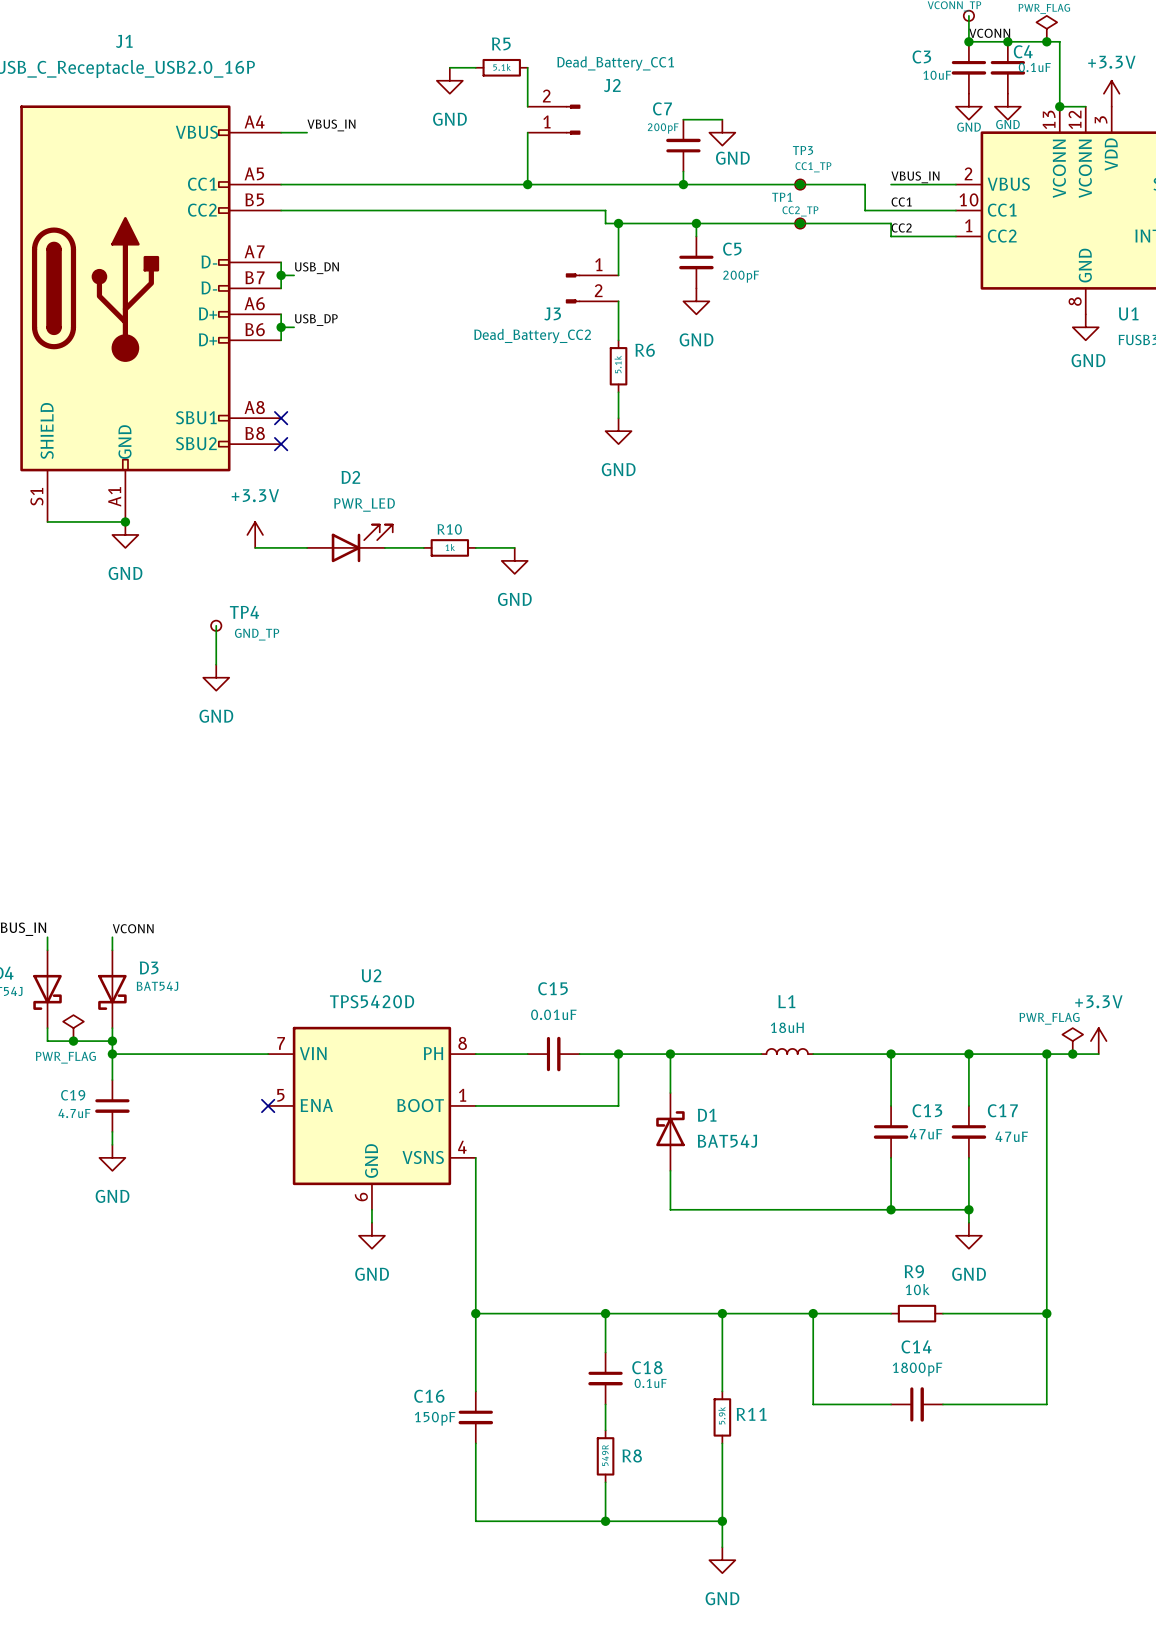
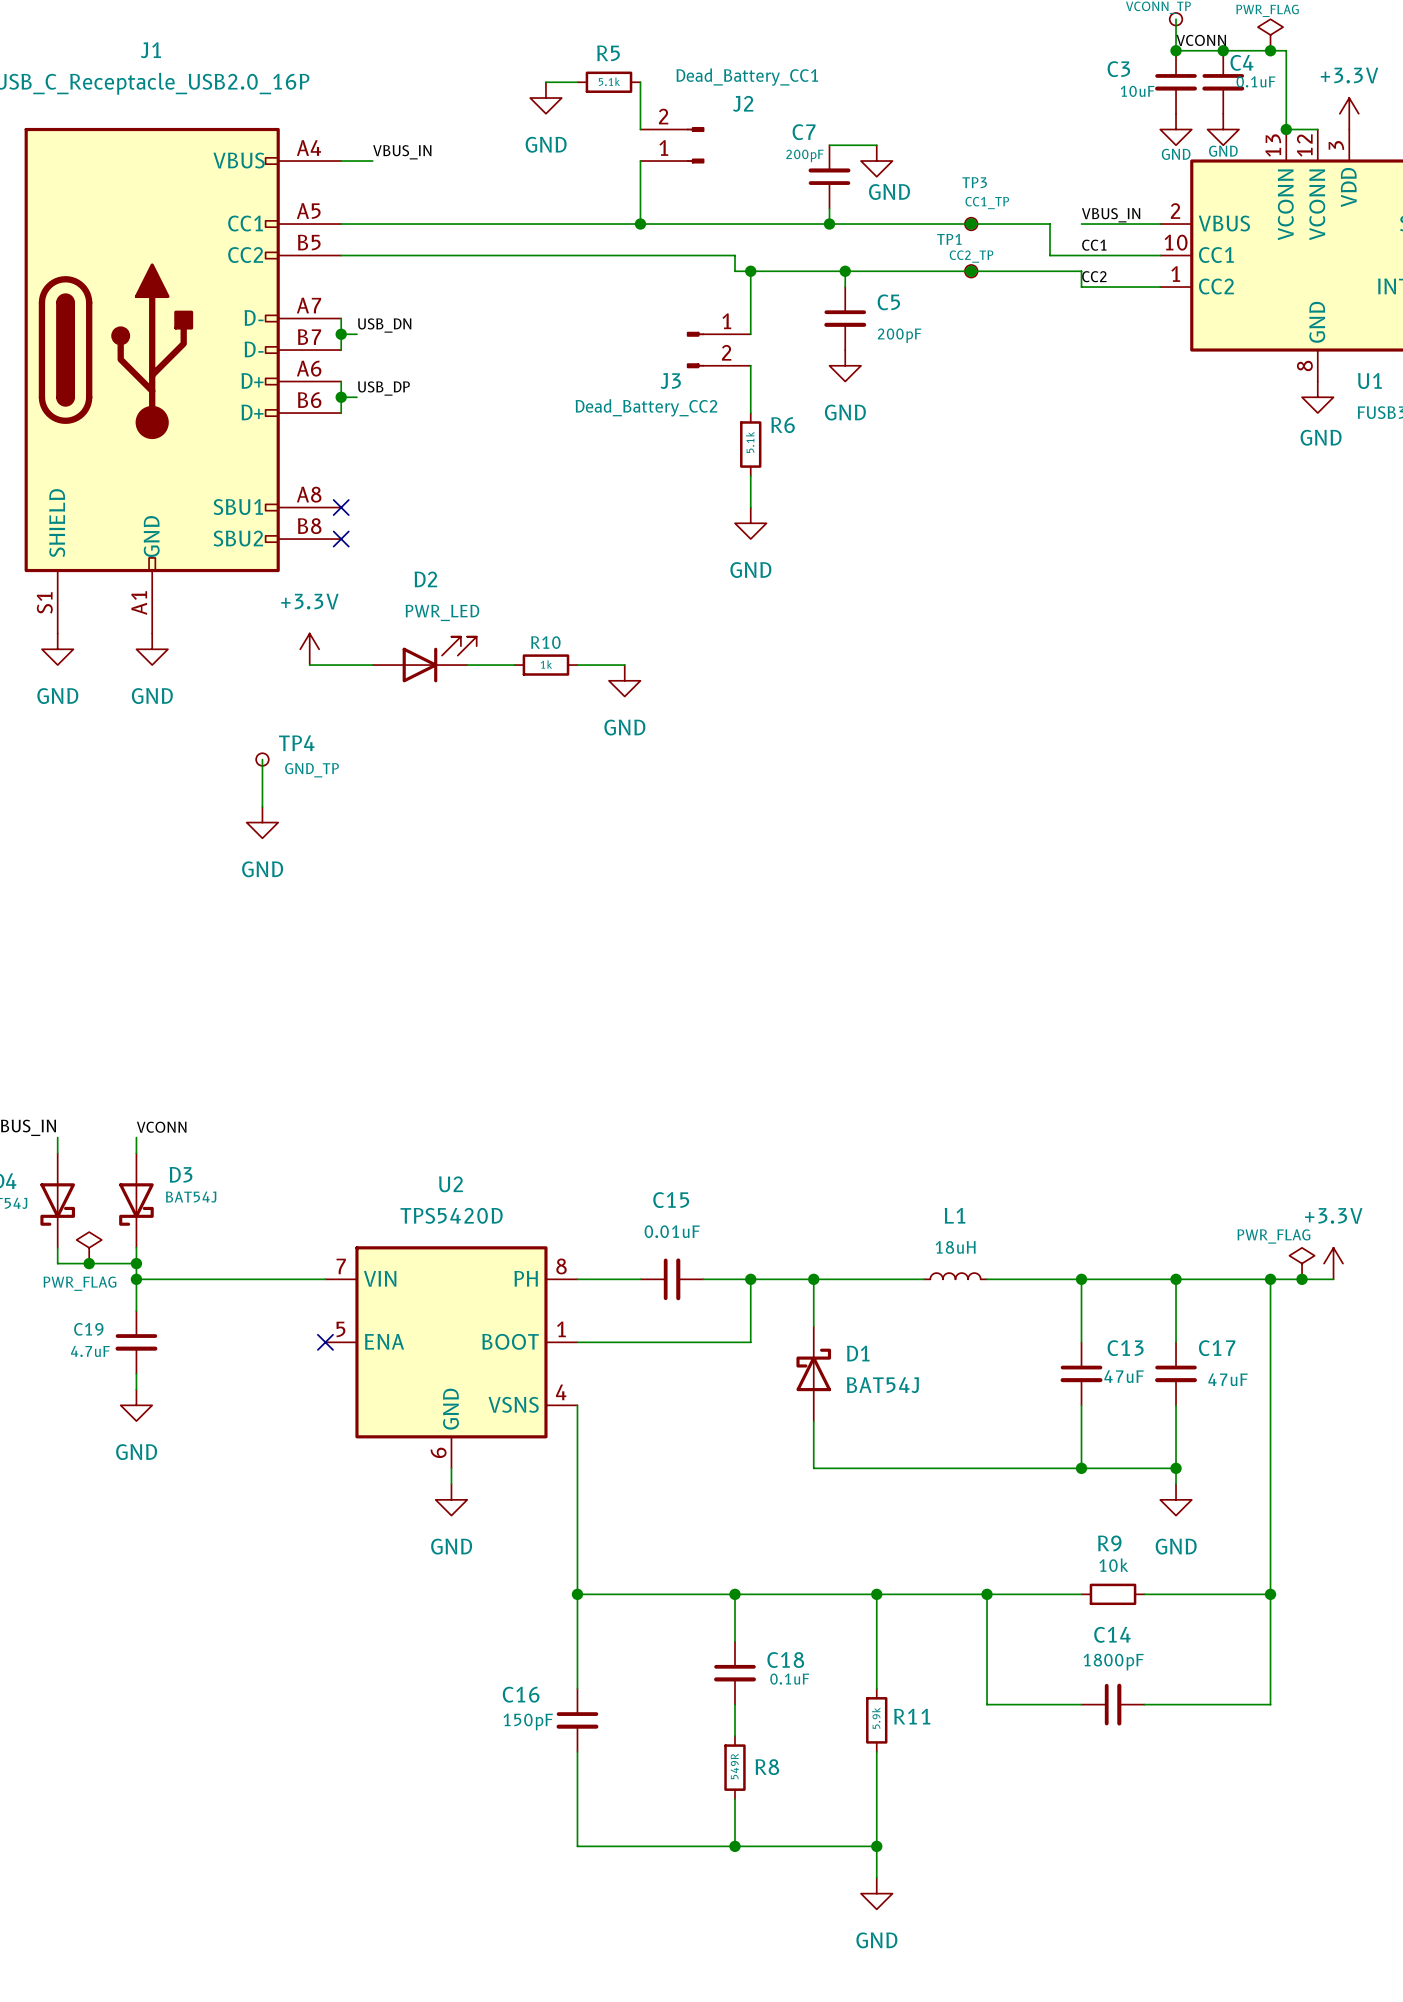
wire: (47, 521) (125, 521) -> none
junction: (125, 521) -> none
power symbol: none -> GND (57, 649)

